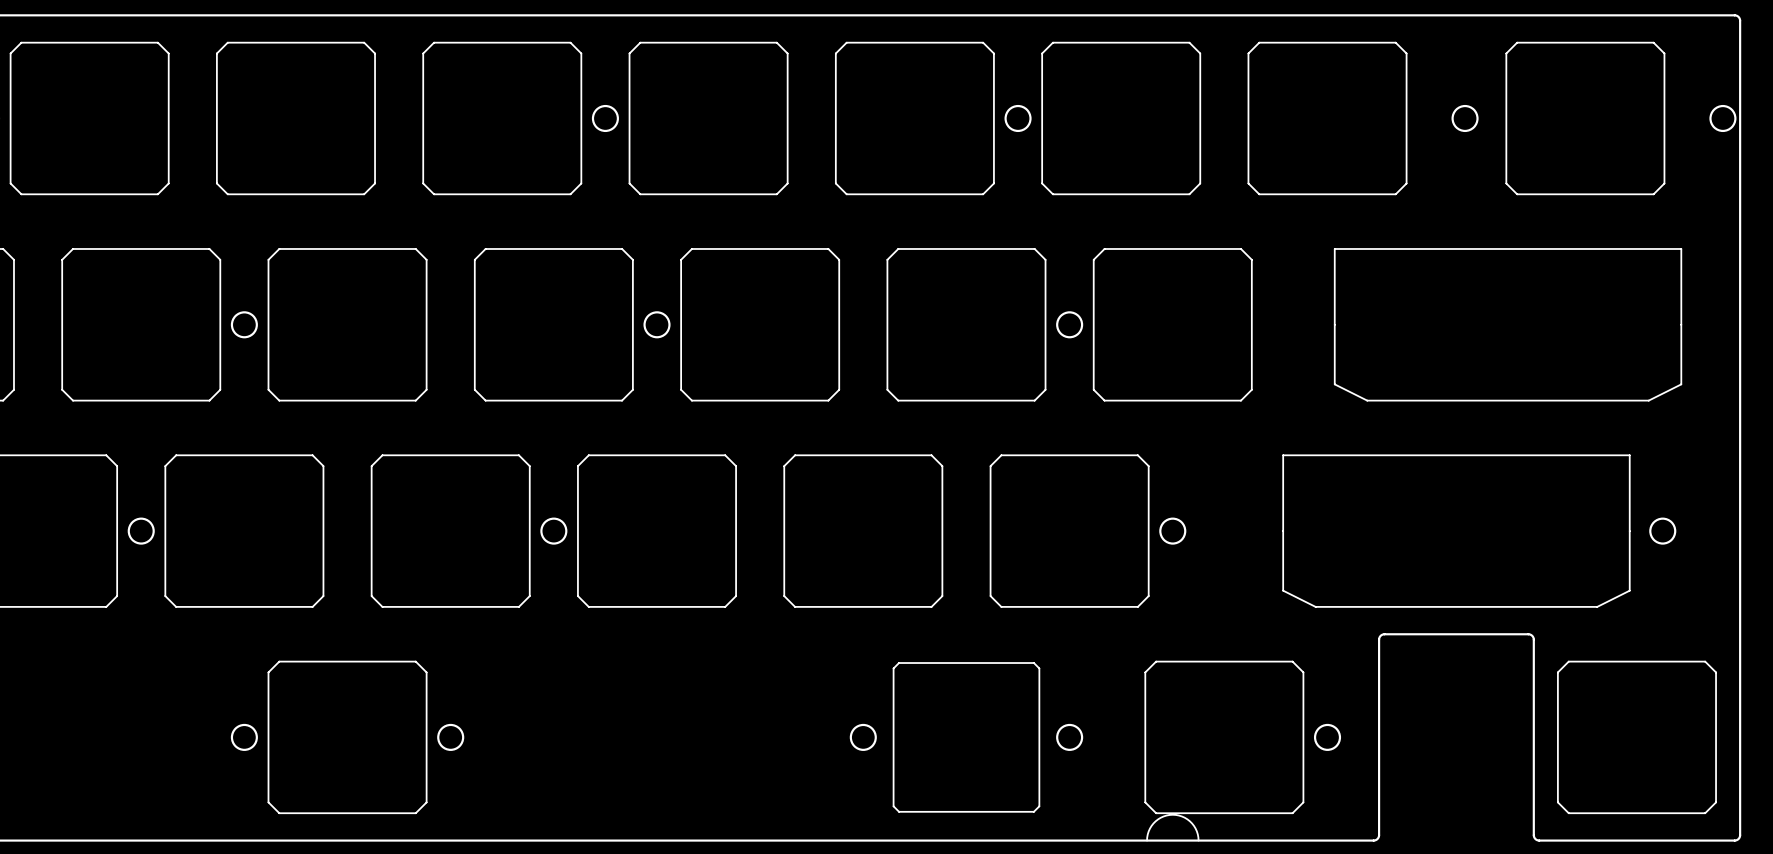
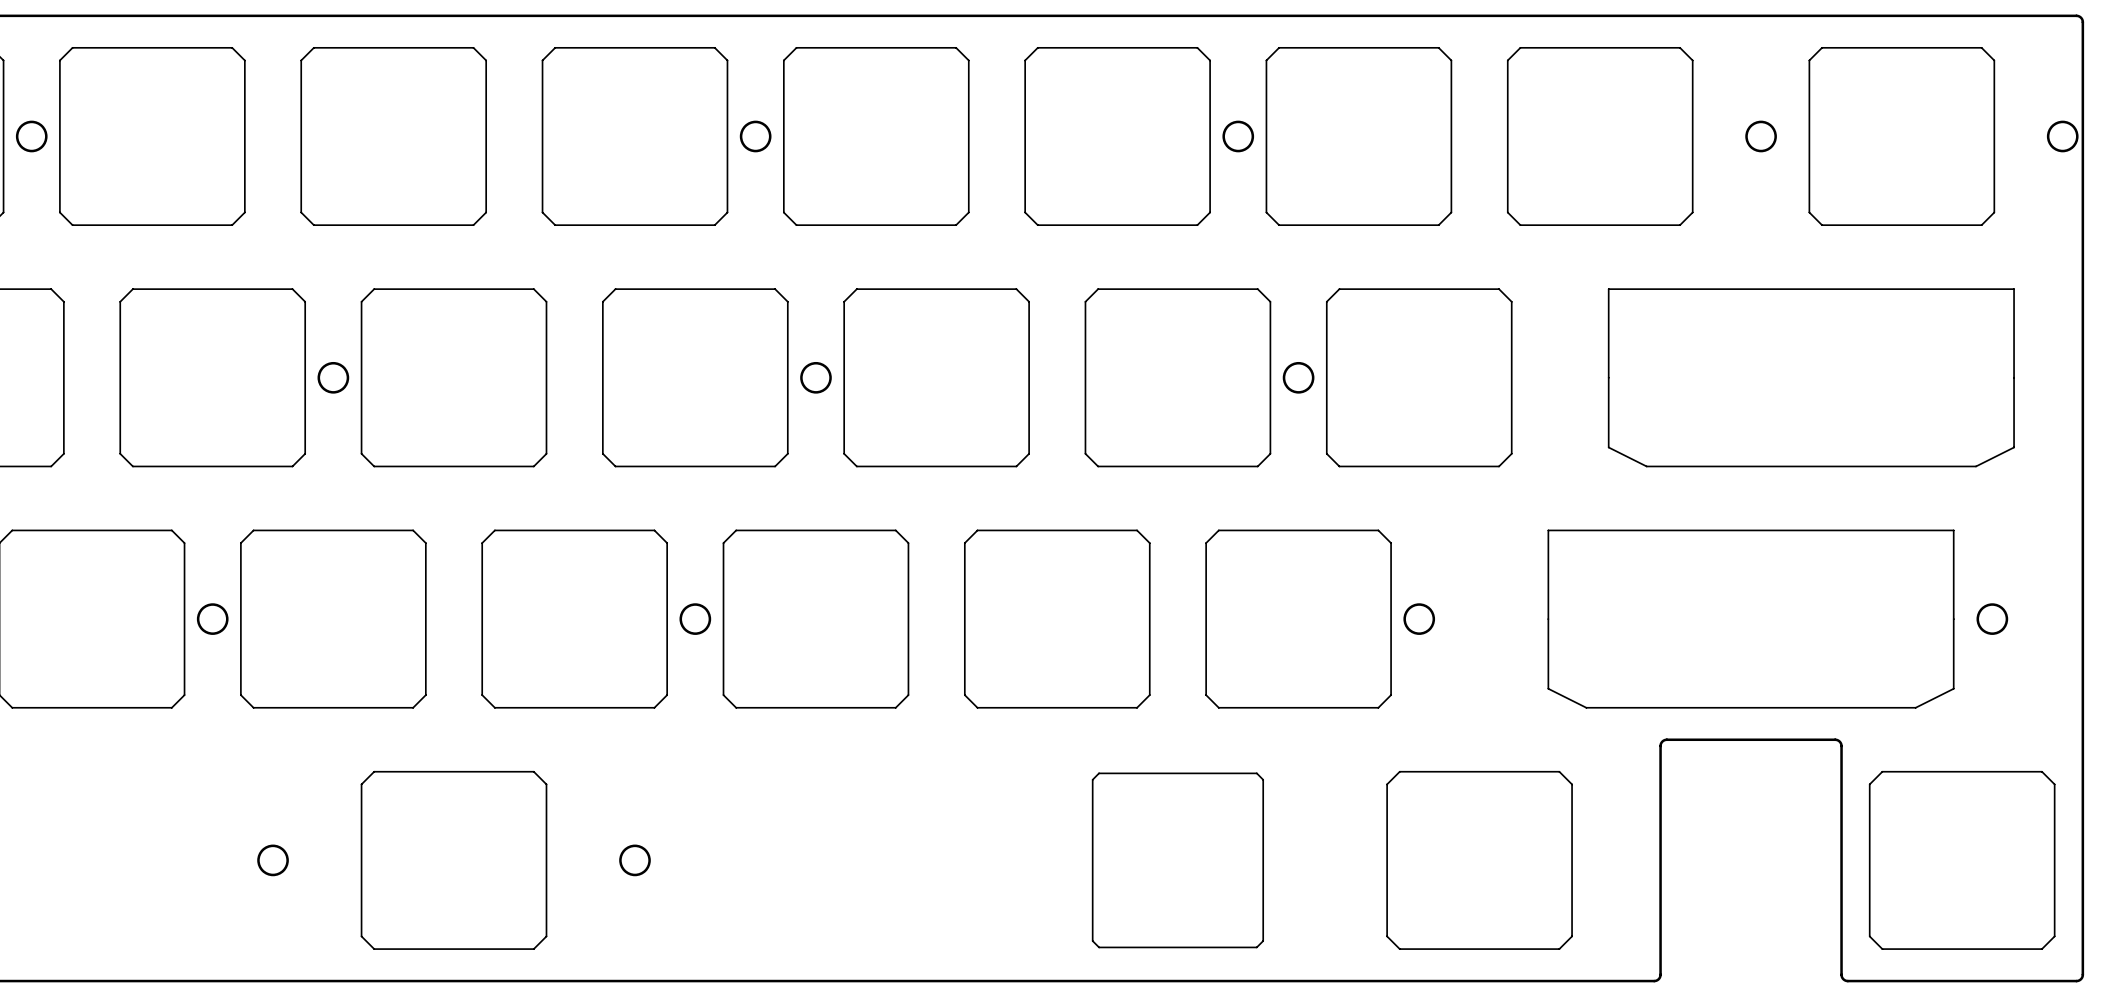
round board edge: [849, 723, 877, 751] -> none
round board edge: [1056, 723, 1084, 751] -> none
round board edge: [1313, 723, 1342, 751] -> none
round board edge position: (244, 737) -> (273, 860)
round board edge position: (450, 737) -> (635, 860)
board edge: (1147, 840) (1148, 831) (1153, 823) (1160, 817) (1172, 814) (1181, 816) (1189, 821) (1195, 828) (1198, 840) -> none

